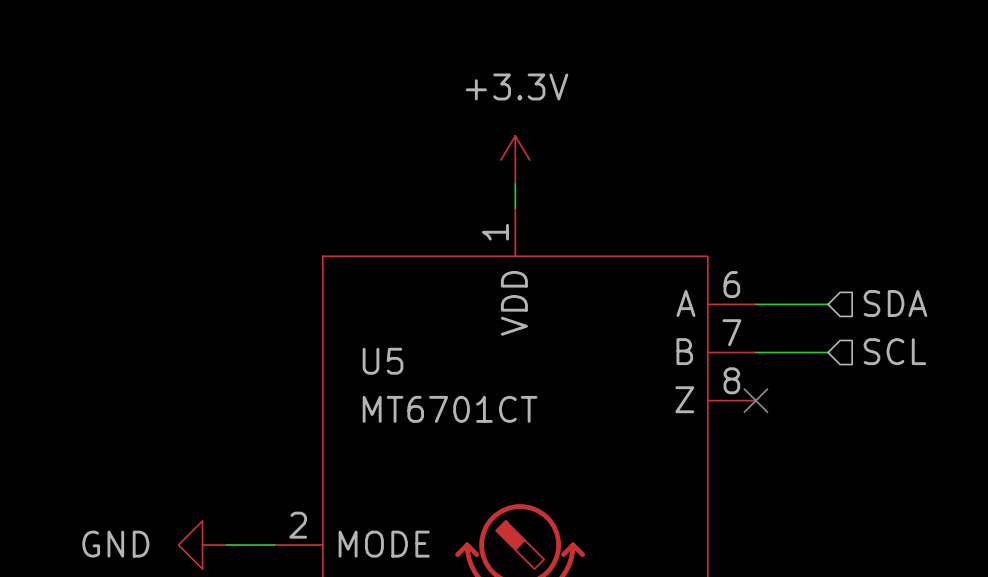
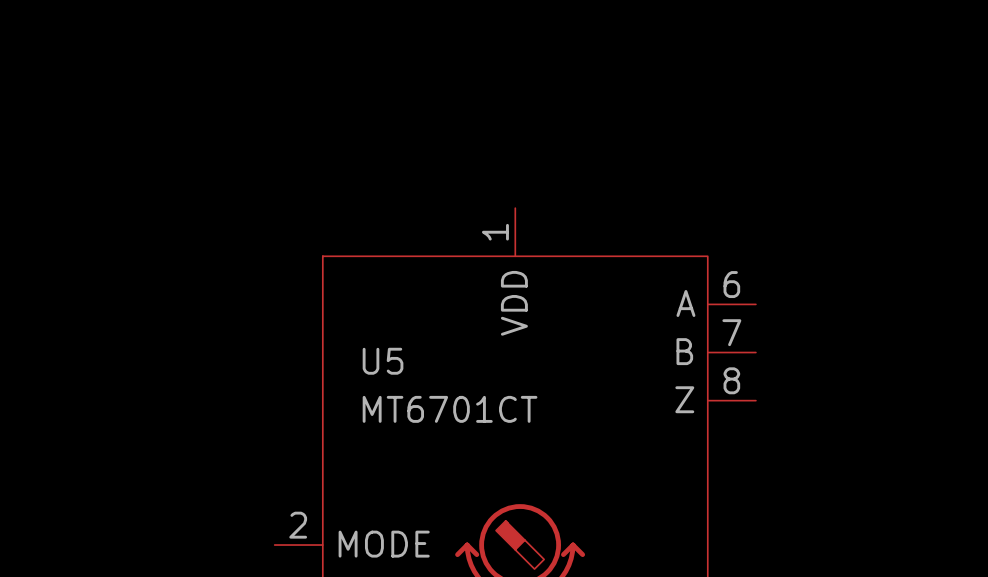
power symbol: +3.3V (515, 160) -> none
wire: (515, 184) (515, 208) -> none
hierarchical label: SDA (895, 303) -> none
wire: (755, 304) (828, 304) -> none
hierarchical label: SCL (894, 351) -> none
wire: (755, 352) (828, 352) -> none
no-connect mark: (755, 400) -> none
power symbol: GND (202, 545) -> none
wire: (226, 545) (274, 545) -> none

